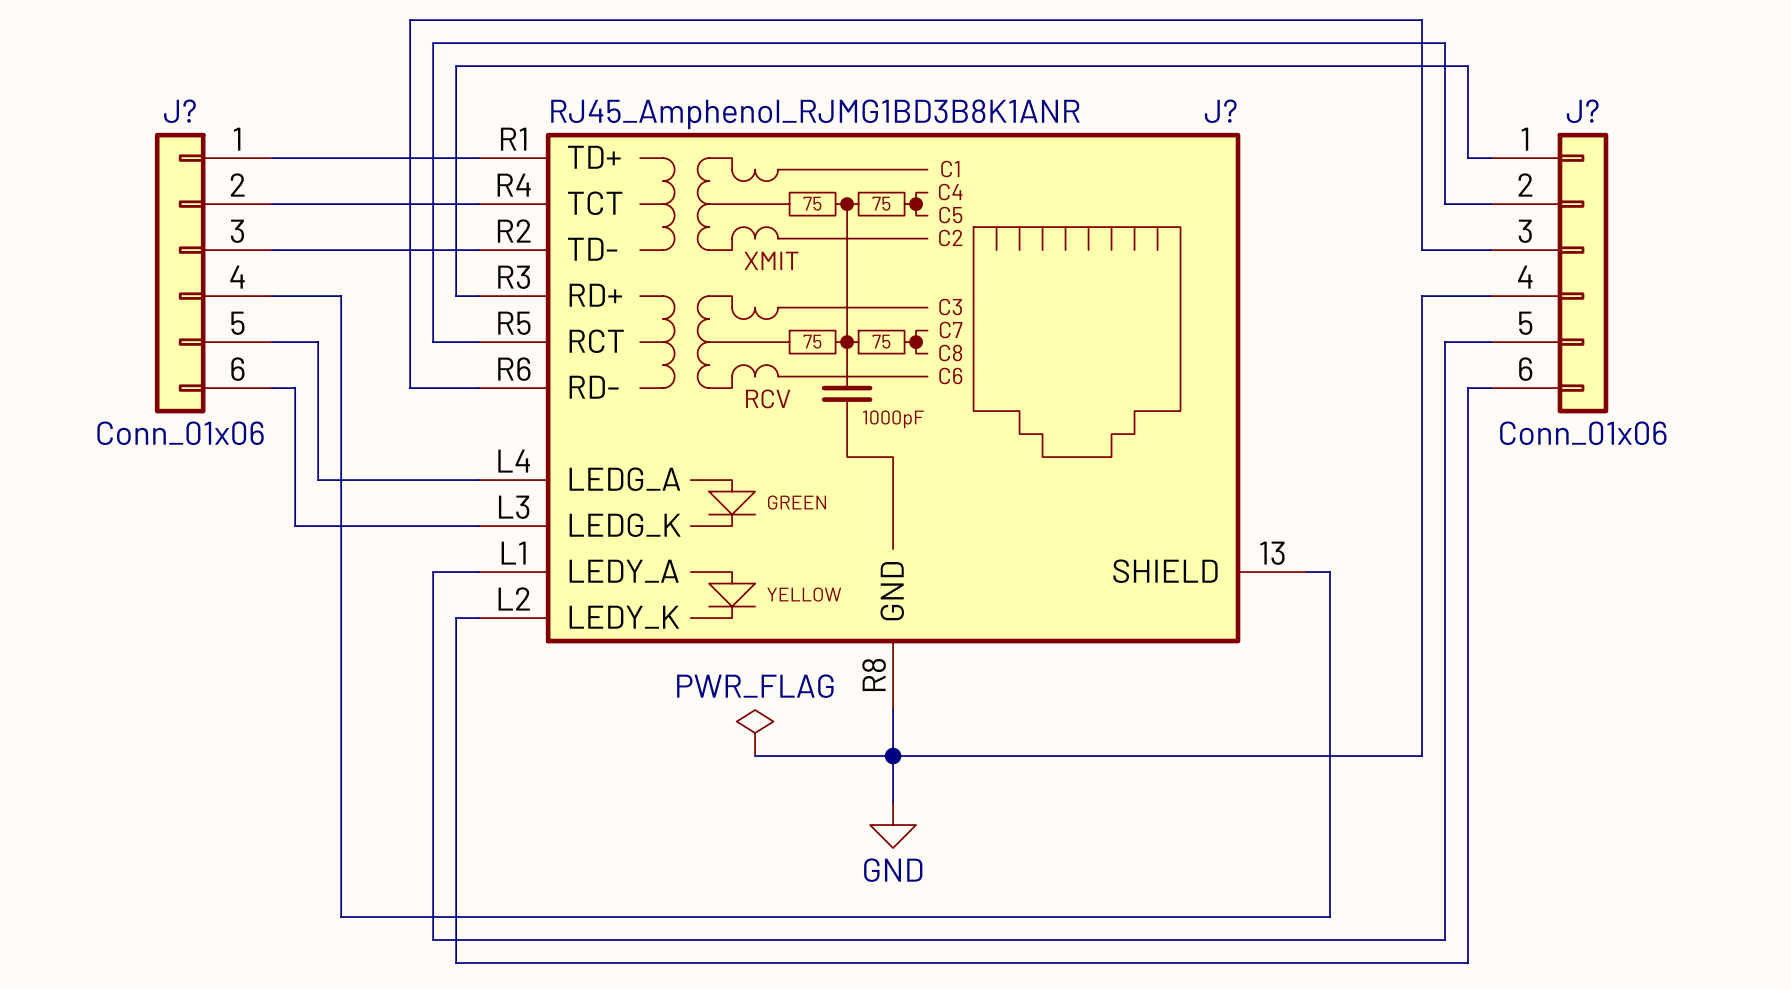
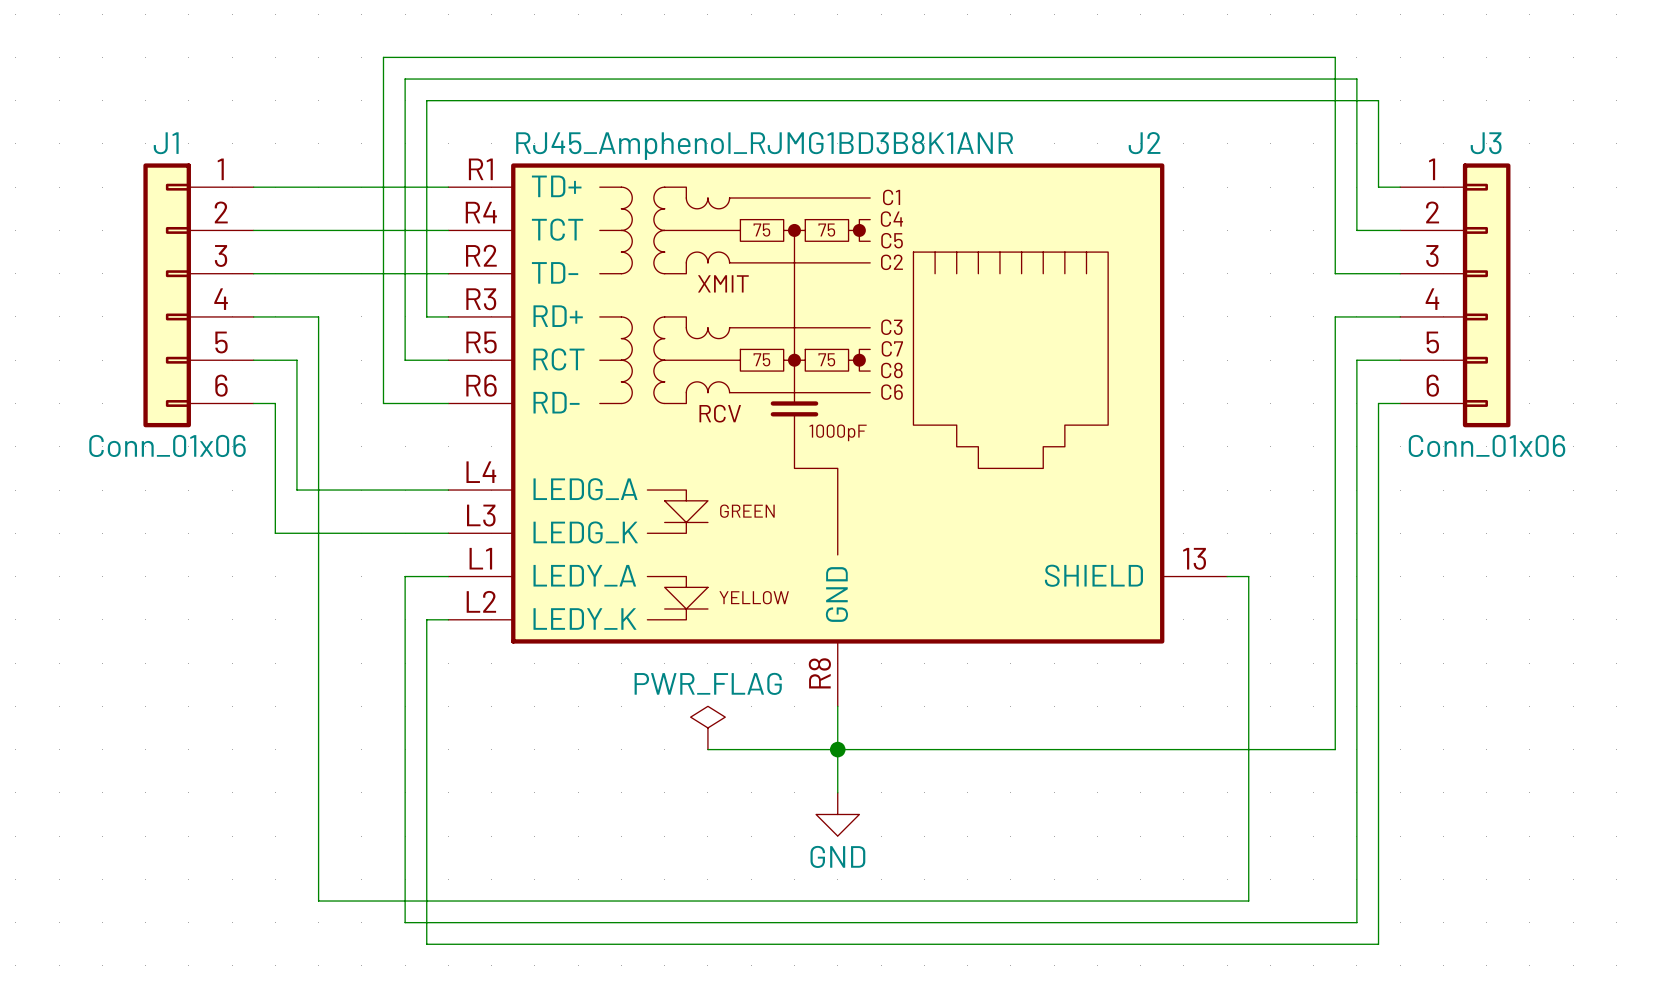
J? name: J? (179, 111) -> J1 (166, 143)
J? name: J? (1220, 111) -> J2 (1144, 143)
J? name: J? (1582, 111) -> J3 (1486, 143)

